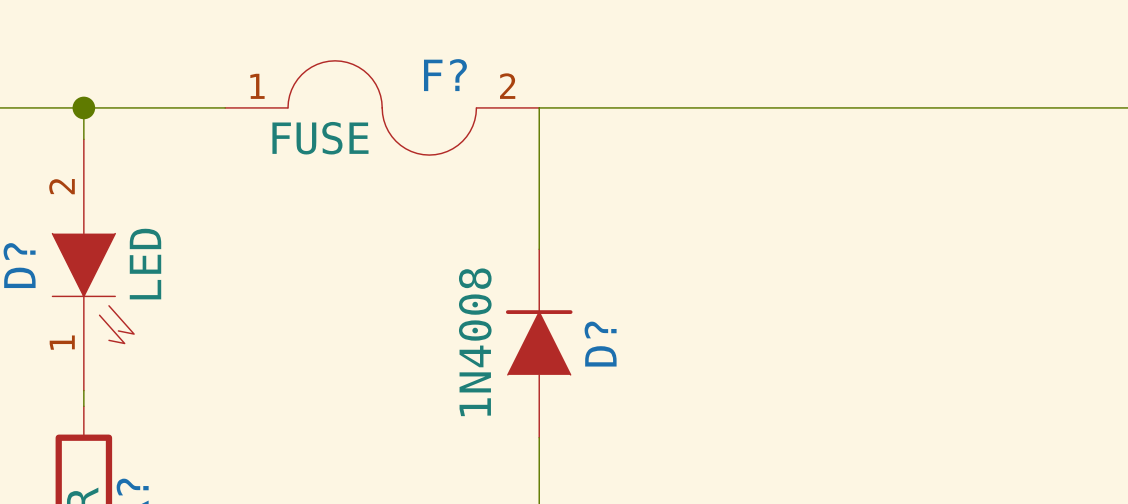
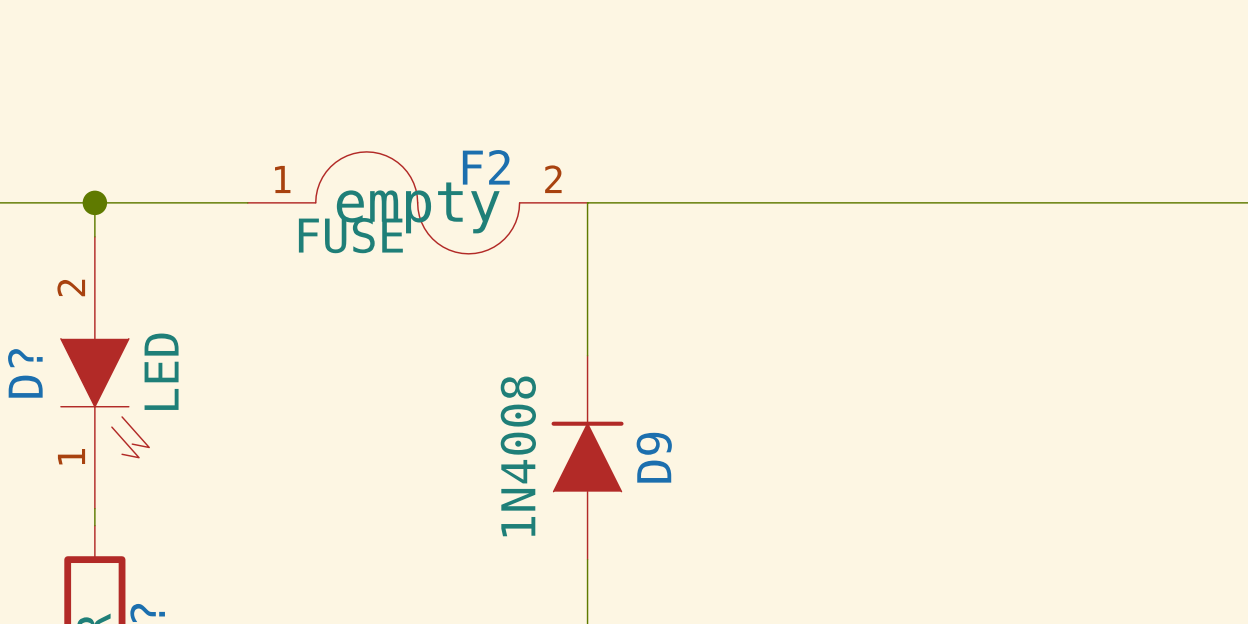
F? name: F? (445, 75) -> F2 (486, 167)
F? text: none -> empty (418, 207)
D? name: D? (600, 344) -> D9 (654, 457)

